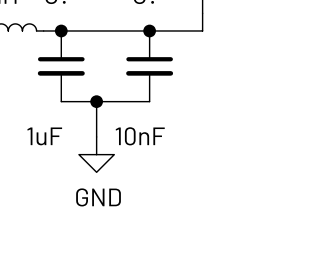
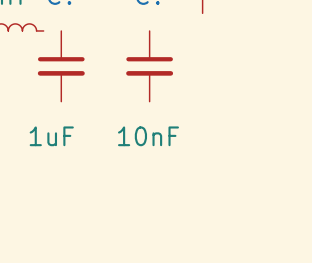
wire: (202, 13) (202, 30) (43, 30) -> none
junction: (61, 30) -> none
junction: (149, 30) -> none
wire: (61, 101) (149, 101) -> none
wire: (96, 101) (96, 136) -> none
junction: (96, 101) -> none
power symbol: GND (96, 154) -> none

